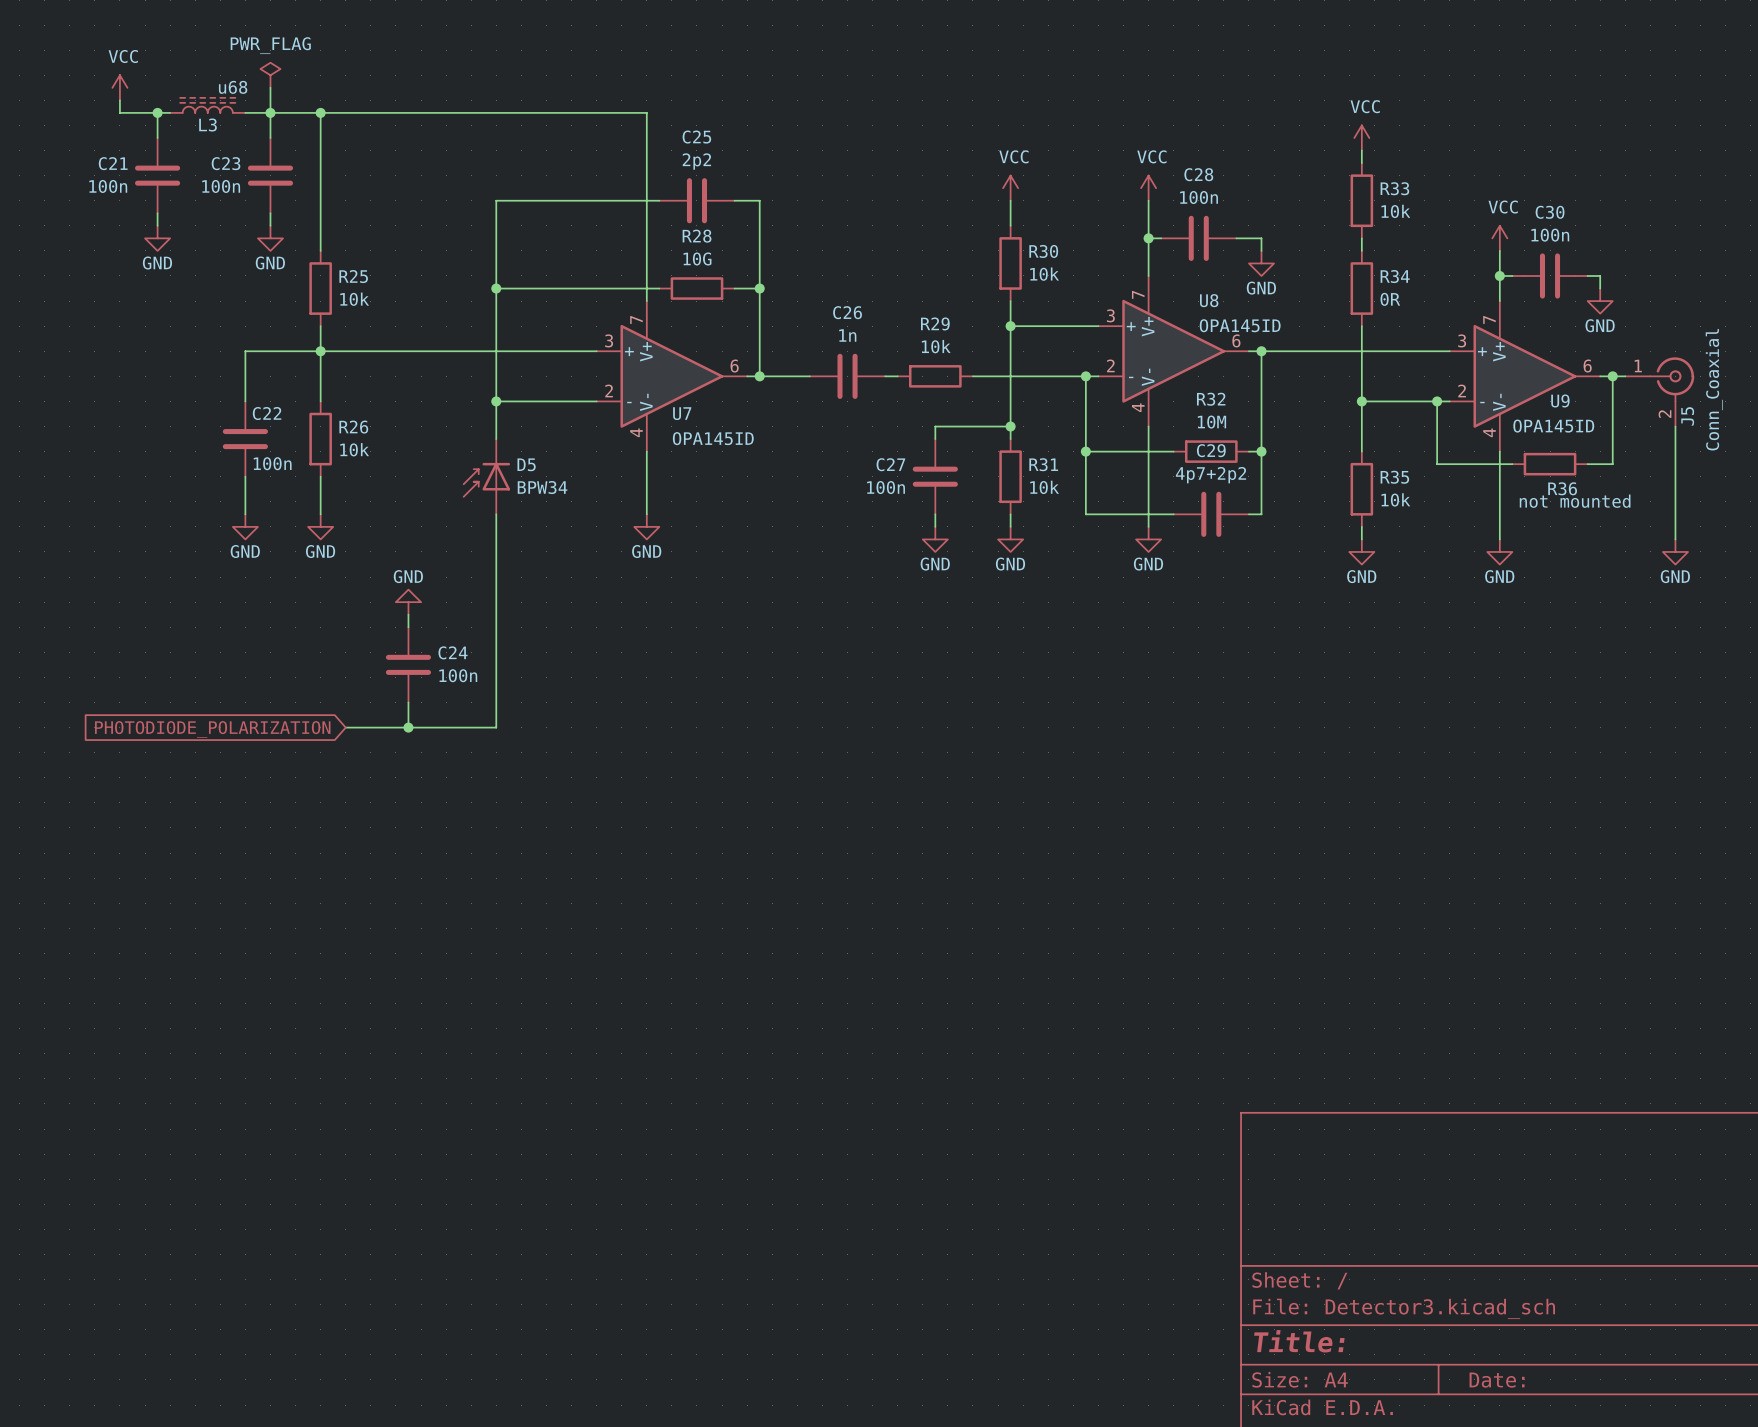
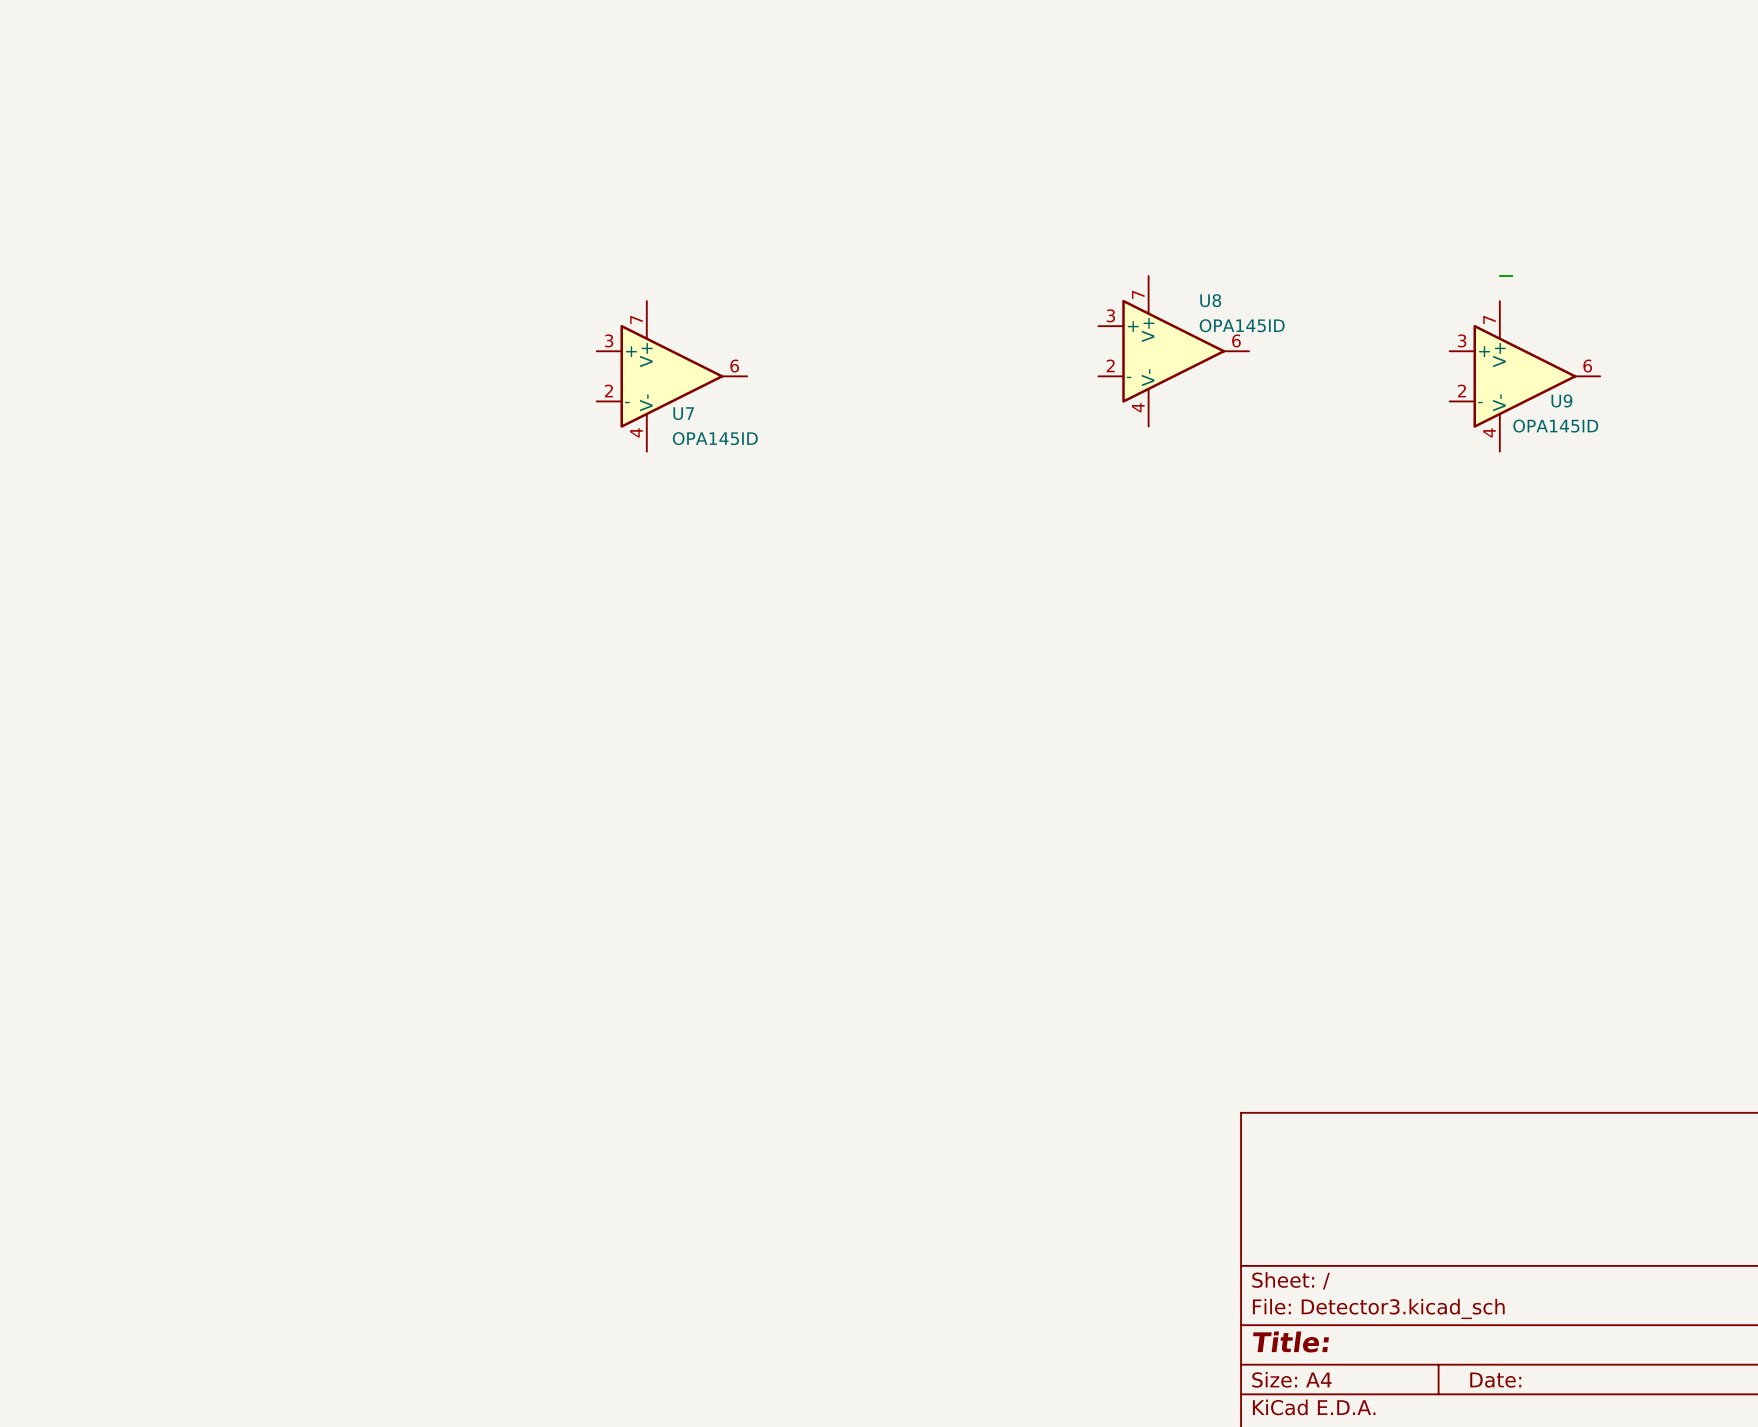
power symbol: PWR_FLAG (270, 75) -> none
power symbol: VCC (119, 87) -> none
wire: (270, 87) (270, 138) -> none
wire: (119, 100) (119, 112) (170, 112) -> none
L3: u68 (207, 105) -> none
wire: (157, 112) (157, 138) -> none
junction: (157, 112) -> none
wire: (245, 112) (646, 112) (646, 301) -> none
junction: (270, 112) -> none
wire: (320, 112) (320, 250) -> none
junction: (320, 112) -> none
power symbol: VCC (1361, 138) -> none
wire: (1361, 150) (1361, 163) -> none
C21: 100n (157, 175) -> none
C23: 100n (270, 175) -> none
power symbol: VCC (1010, 188) -> none
power symbol: VCC (1148, 188) -> none
wire: (659, 200) (496, 200) (496, 439) -> none
C25: 2p2 (696, 200) -> none
wire: (734, 200) (759, 200) (759, 376) -> none
wire: (1010, 200) (1010, 225) -> none
wire: (1148, 200) (1148, 275) -> none
R33: 10k (1361, 200) -> none
wire: (157, 213) (157, 225) -> none
wire: (270, 213) (270, 225) -> none
power symbol: GND (157, 238) -> none
power symbol: GND (270, 238) -> none
wire: (1148, 238) (1161, 238) -> none
junction: (1148, 238) -> none
C28: 100n (1198, 238) -> none
wire: (1236, 238) (1261, 238) (1261, 250) -> none
wire: (1361, 238) (1361, 250) -> none
power symbol: VCC (1499, 238) -> none
wire: (1499, 250) (1499, 301) -> none
R30: 10k (1010, 263) -> none
power symbol: GND (1261, 263) -> none
junction: (1499, 275) -> none
C30: 100n (1550, 275) -> none
wire: (1587, 275) (1600, 275) (1600, 288) -> none
R25: 10k (320, 288) -> none
wire: (496, 288) (659, 288) -> none
junction: (496, 288) -> none
R28: 10G (696, 288) -> none
wire: (734, 288) (759, 288) -> none
junction: (759, 288) -> none
R34: 0R (1361, 288) -> none
wire: (1010, 301) (1010, 439) -> none
power symbol: GND (1600, 301) -> none
wire: (320, 326) (320, 401) -> none
wire: (1010, 326) (1098, 326) -> none
junction: (1010, 326) -> none
wire: (1361, 326) (1361, 451) -> none
junction: (320, 351) -> none
wire: (596, 351) (245, 351) (245, 401) -> none
wire: (1248, 351) (1449, 351) -> none
wire: (1261, 351) (1261, 514) (1248, 514) -> none
junction: (1261, 351) -> none
wire: (747, 376) (809, 376) -> none
junction: (759, 376) -> none
C26: 1n (847, 376) -> none
wire: (885, 376) (897, 376) -> none
R29: 10k (935, 376) -> none
wire: (972, 376) (1098, 376) -> none
wire: (1085, 376) (1085, 514) (1173, 514) -> none
junction: (1085, 376) -> none
wire: (1600, 376) (1625, 376) -> none
wire: (1612, 376) (1612, 464) (1587, 464) -> none
junction: (1612, 376) -> none
J5: Conn_Coaxial (1659, 391) -> none
wire: (496, 401) (596, 401) -> none
junction: (496, 401) -> none
wire: (1361, 401) (1449, 401) -> none
junction: (1361, 401) -> none
wire: (1437, 401) (1437, 464) (1512, 464) -> none
junction: (1437, 401) -> none
wire: (1010, 426) (935, 426) (935, 439) -> none
junction: (1010, 426) -> none
wire: (1148, 426) (1148, 526) -> none
wire: (1675, 426) (1675, 539) -> none
C22: 100n (245, 439) -> none
R26: 10k (320, 439) -> none
wire: (646, 451) (646, 514) -> none
wire: (1085, 451) (1173, 451) -> none
junction: (1085, 451) -> none
R32: 10M (1211, 451) -> none
wire: (1248, 451) (1261, 451) -> none
junction: (1261, 451) -> none
wire: (1499, 451) (1499, 539) -> none
R36: not mounted (1550, 464) -> none
wire: (245, 476) (245, 514) -> none
wire: (320, 476) (320, 514) -> none
D5: BPW34 (486, 476) -> none
C27: 100n (935, 476) -> none
R31: 10k (1010, 476) -> none
R35: 10k (1361, 489) -> none
wire: (496, 514) (496, 727) (345, 727) -> none
wire: (935, 514) (935, 526) -> none
wire: (1010, 514) (1010, 526) -> none
C29: 4p7+2p2 (1211, 514) -> none
power symbol: GND (245, 526) -> none
power symbol: GND (320, 526) -> none
power symbol: GND (646, 526) -> none
wire: (1361, 526) (1361, 539) -> none
power symbol: GND (935, 539) -> none
power symbol: GND (1010, 539) -> none
power symbol: GND (1148, 539) -> none
power symbol: GND (1361, 551) -> none
power symbol: GND (1499, 551) -> none
power symbol: GND (1675, 551) -> none
power symbol: GND (408, 602) -> none
wire: (408, 614) (408, 627) -> none
C24: 100n (408, 664) -> none
wire: (408, 702) (408, 727) -> none
junction: (408, 727) -> none
global label: PHOTODIODE_POLARIZATION (212, 729) -> none

